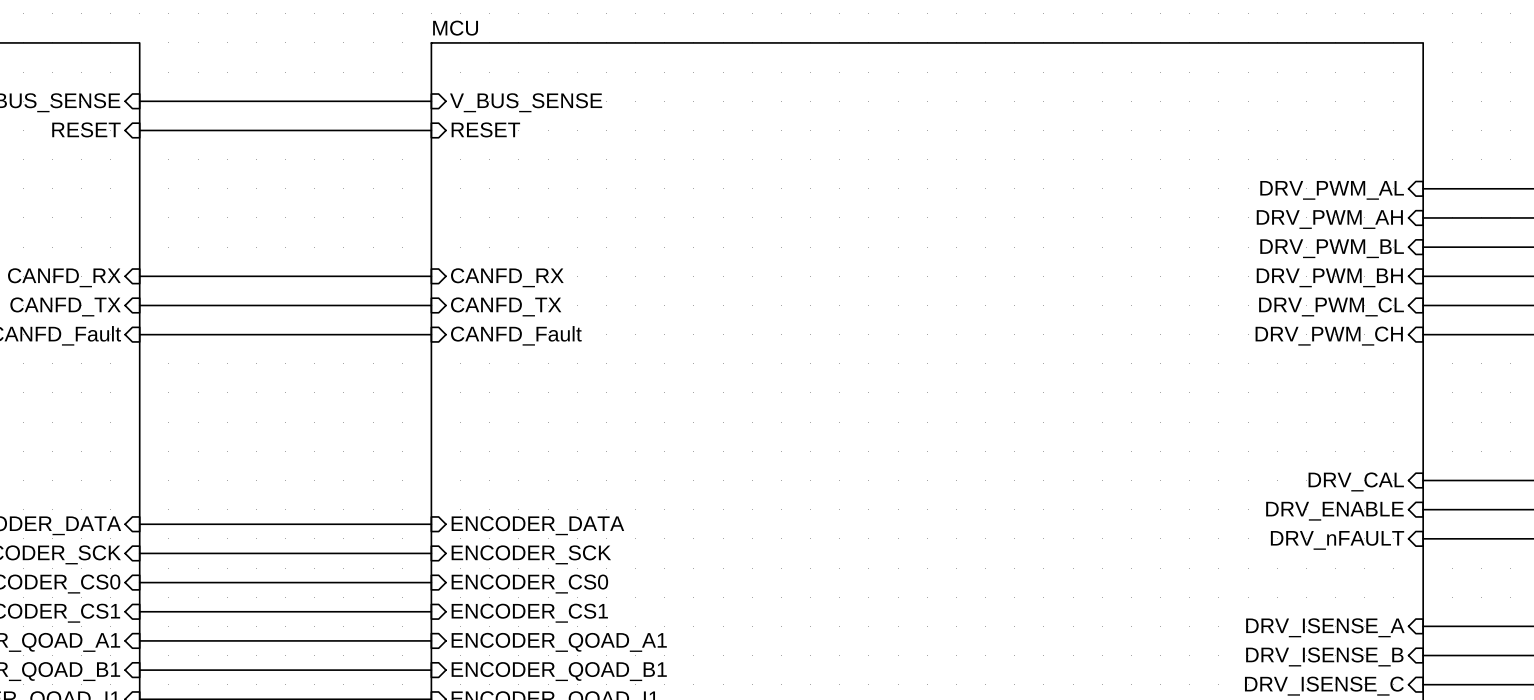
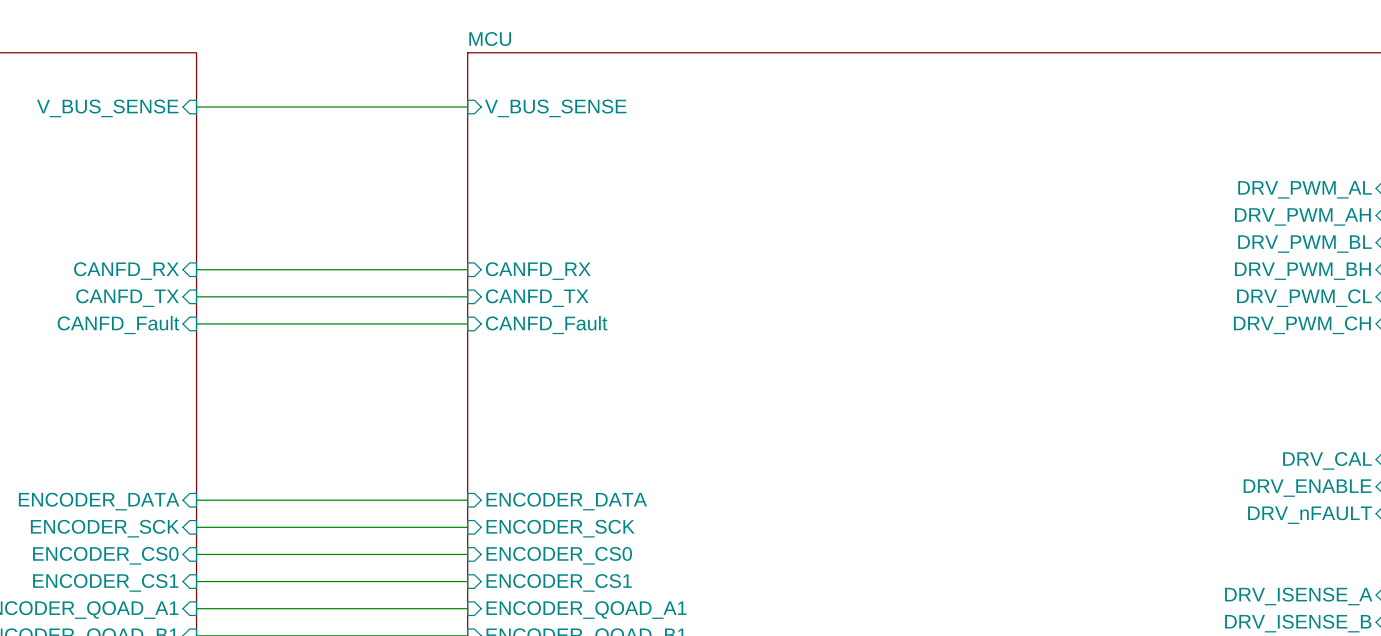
sheet pin: RESET (86, 129) -> none
sheet pin: RESET (485, 129) -> none
wire: (139, 130) (431, 130) -> none

